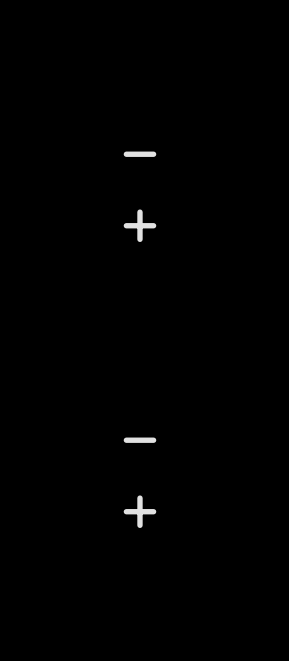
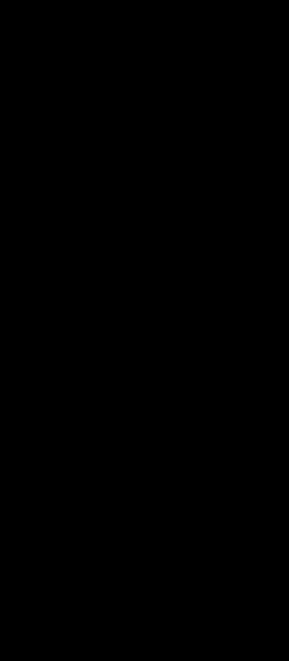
text: - (139, 154) -> none
text: + (139, 225) -> none
text: - (139, 440) -> none
text: + (139, 511) -> none

